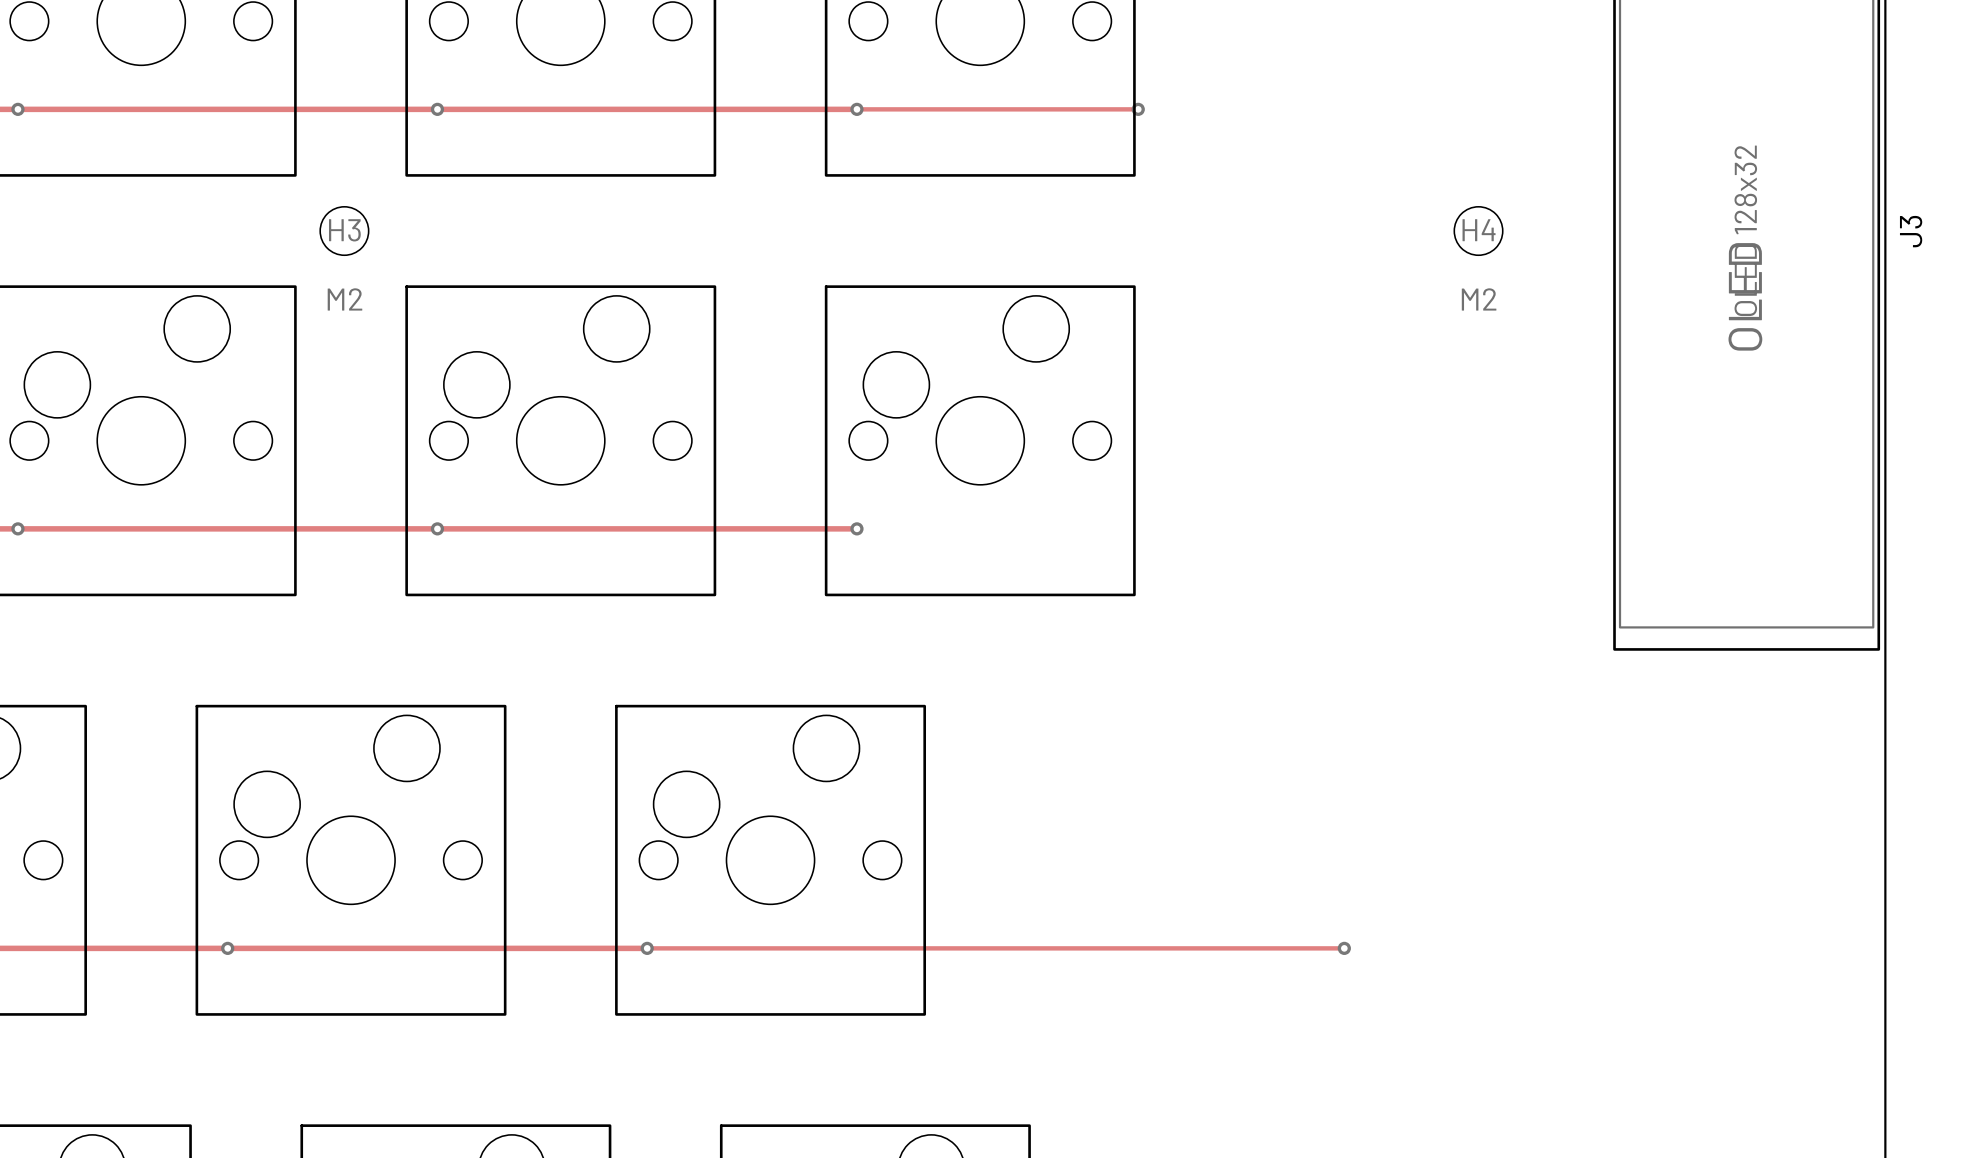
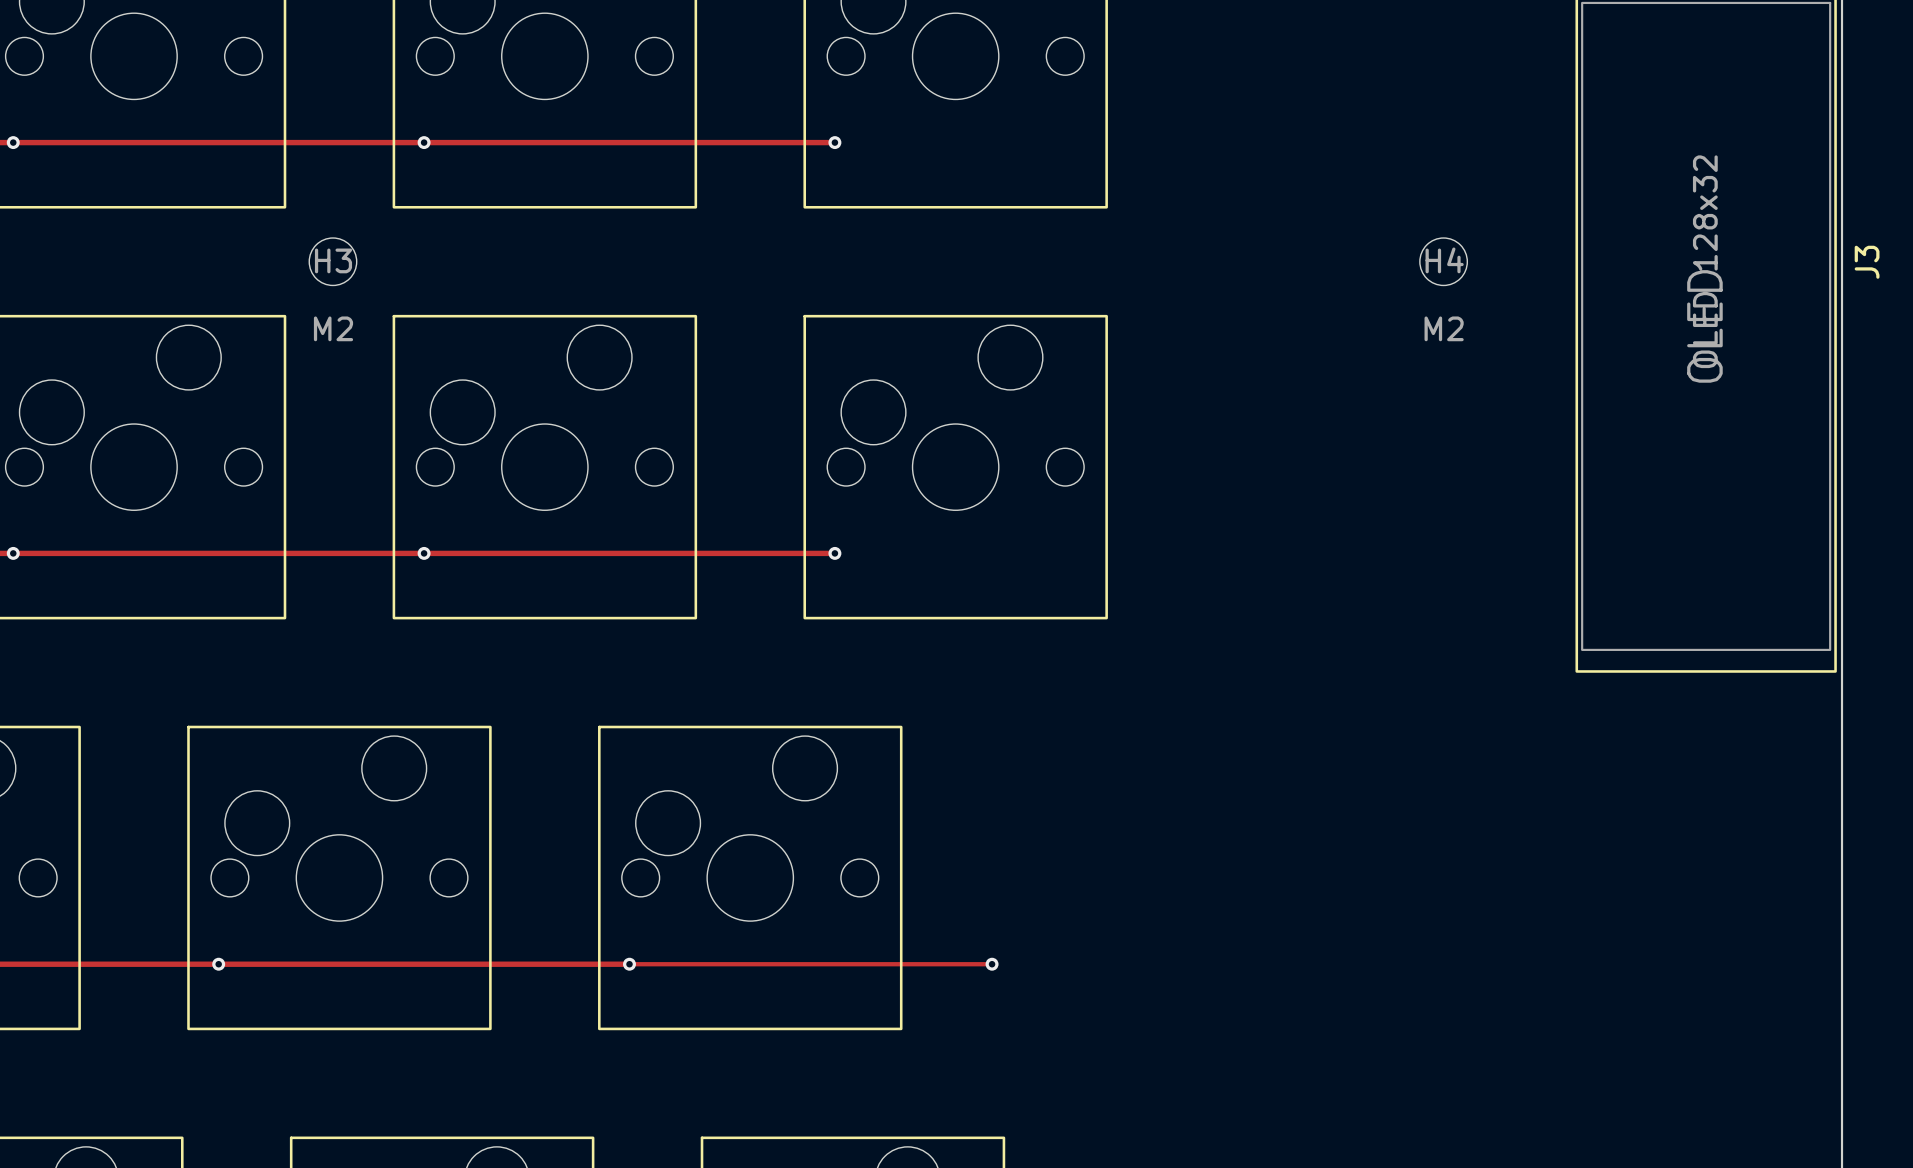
track: (856, 109) (1138, 109) -> none
via: (1138, 109) -> none
track: (1017, 948) (1344, 948) -> none
via: none -> (992, 964)
via: (1344, 948) -> none

